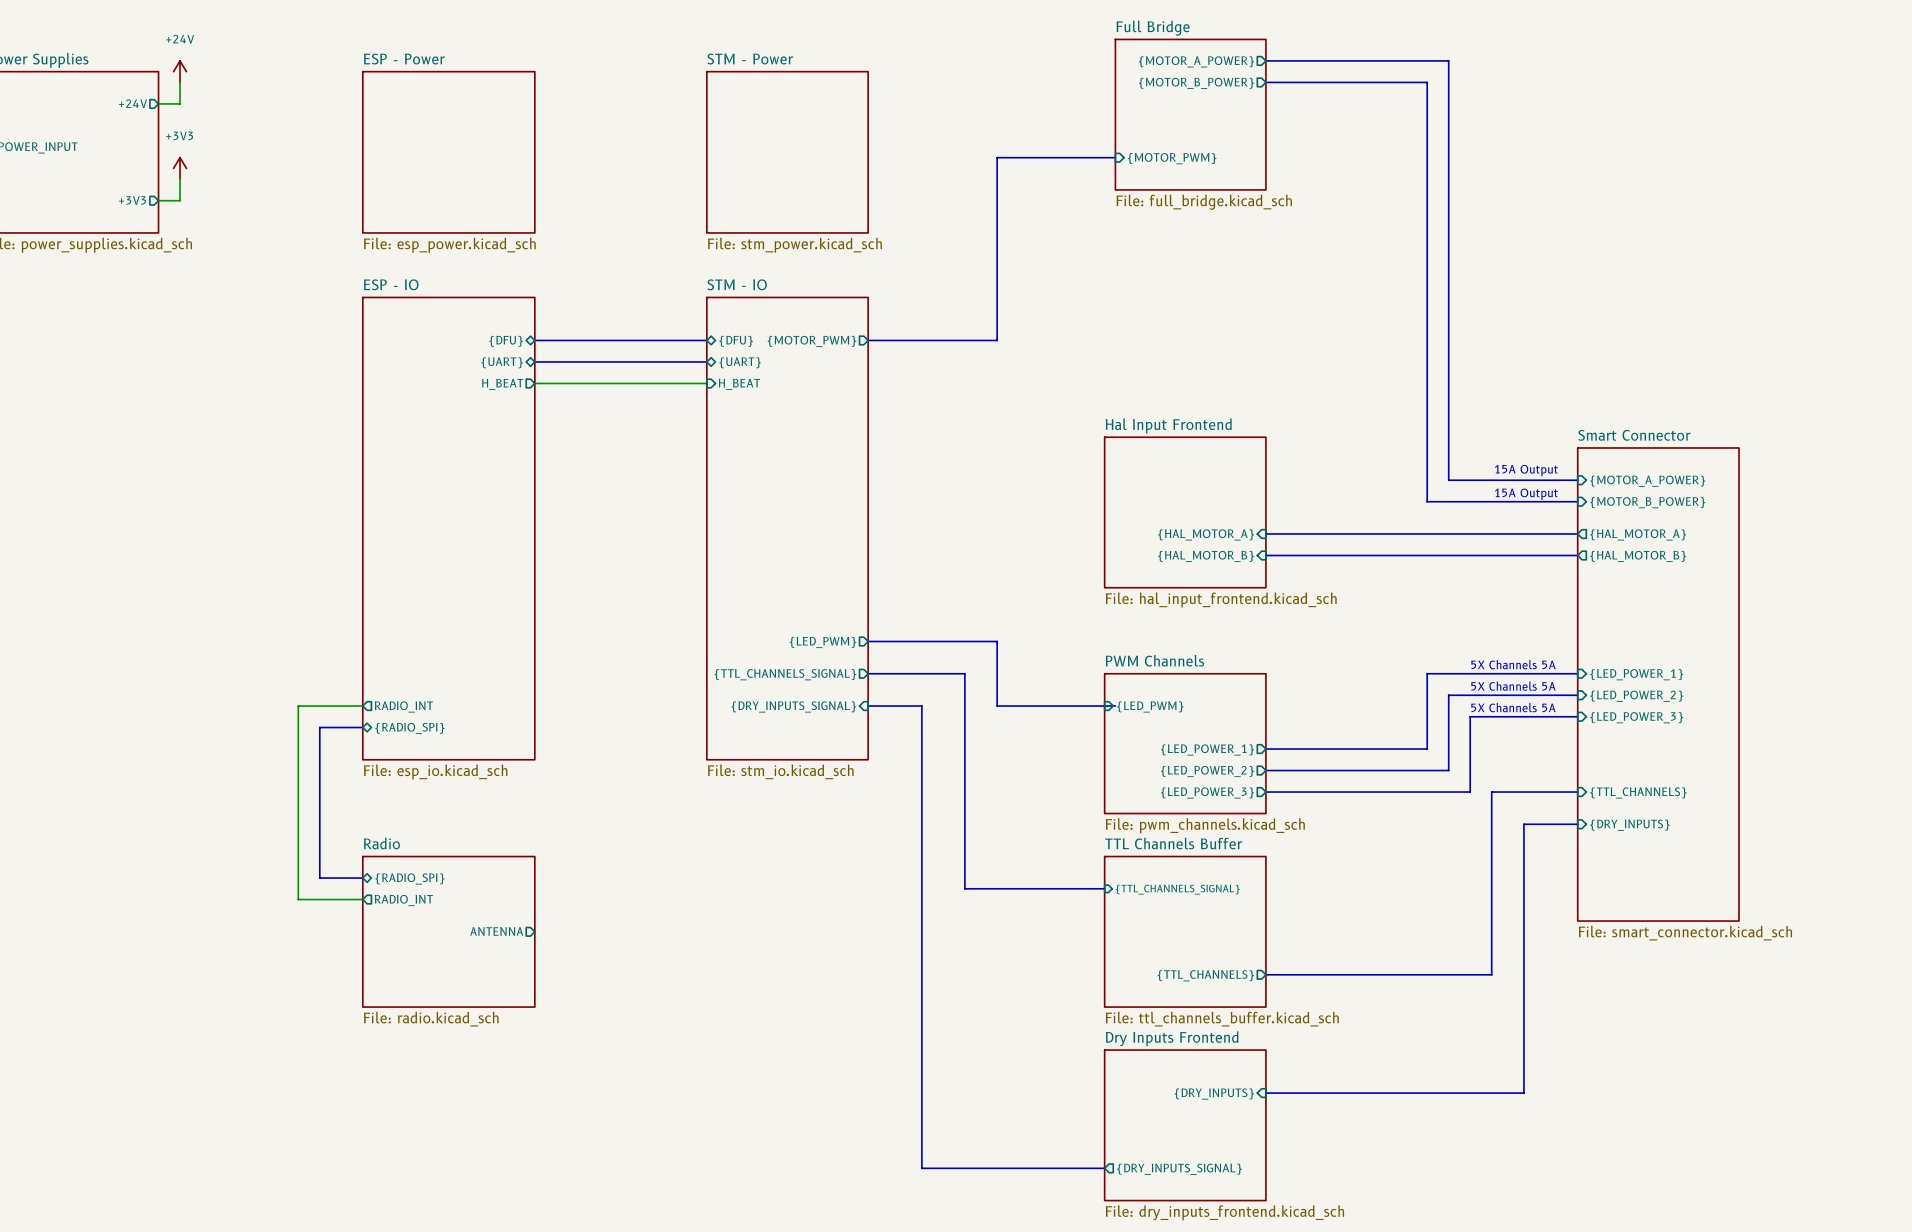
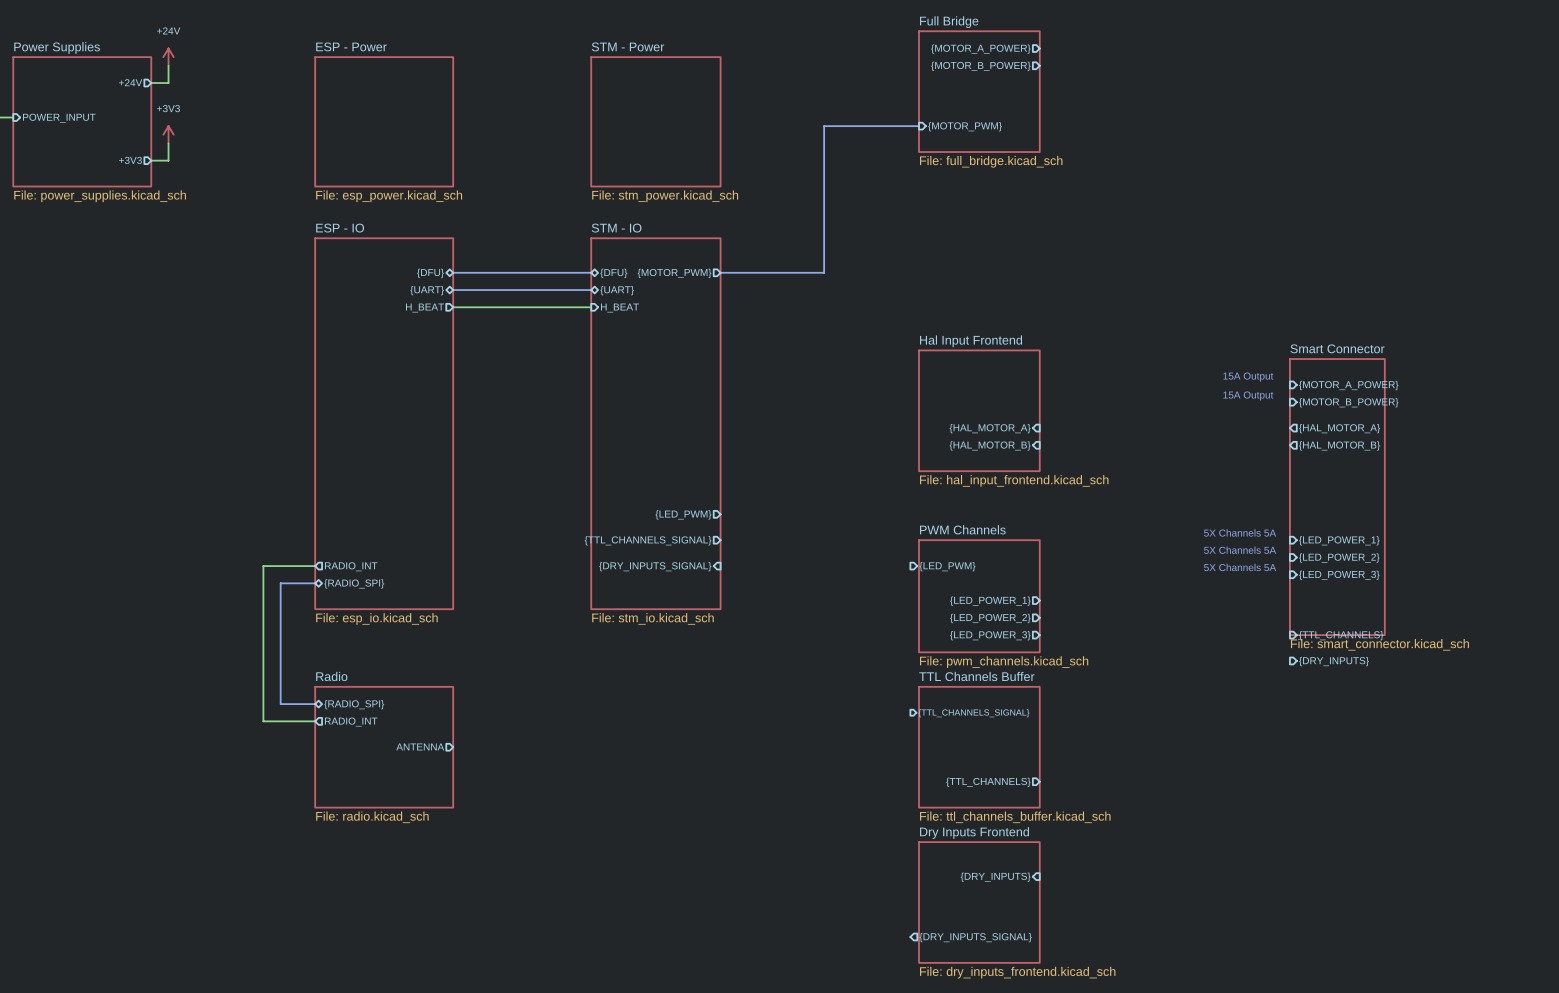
bus: (1265, 60) (1448, 60) (1448, 480) (1577, 480) -> none
bus: (1265, 82) (1427, 82) (1427, 501) (1577, 501) -> none
sheet Hal Input Frontend shape: [1104, 436, 1267, 589] -> [918, 349, 1041, 472]
bus: (1265, 533) (1577, 533) -> none
bus: (1265, 555) (1577, 555) -> none
sheet Smart Connector: none -> File: smart_connector.kicad_sch (1337, 497)
bus: (868, 641) (997, 641) (997, 706) (1115, 706) -> none
bus: (868, 673) (964, 673) (964, 888) (1104, 888) -> none
sheet PWM Channels shape: [1104, 673, 1267, 815] -> [918, 539, 1041, 653]
bus: (1577, 673) (1427, 673) (1427, 749) (1265, 749) -> none
sheet Smart Connector: File: smart_connector.kicad_sch (1658, 684) -> none
bus: (1577, 695) (1448, 695) (1448, 770) (1265, 770) -> none
bus: (868, 706) (921, 706) (921, 1168) (1104, 1168) -> none
bus: (1577, 716) (1470, 716) (1470, 792) (1265, 792) -> none
bus: (1577, 792) (1491, 792) (1491, 974) (1265, 974) -> none
bus: (1577, 824) (1523, 824) (1523, 1093) (1265, 1093) -> none
sheet TTL Channels Buffer shape: [1104, 855, 1267, 1008] -> [918, 686, 1041, 809]
sheet Dry Inputs Frontend shape: [1104, 1049, 1267, 1202] -> [918, 841, 1041, 964]

